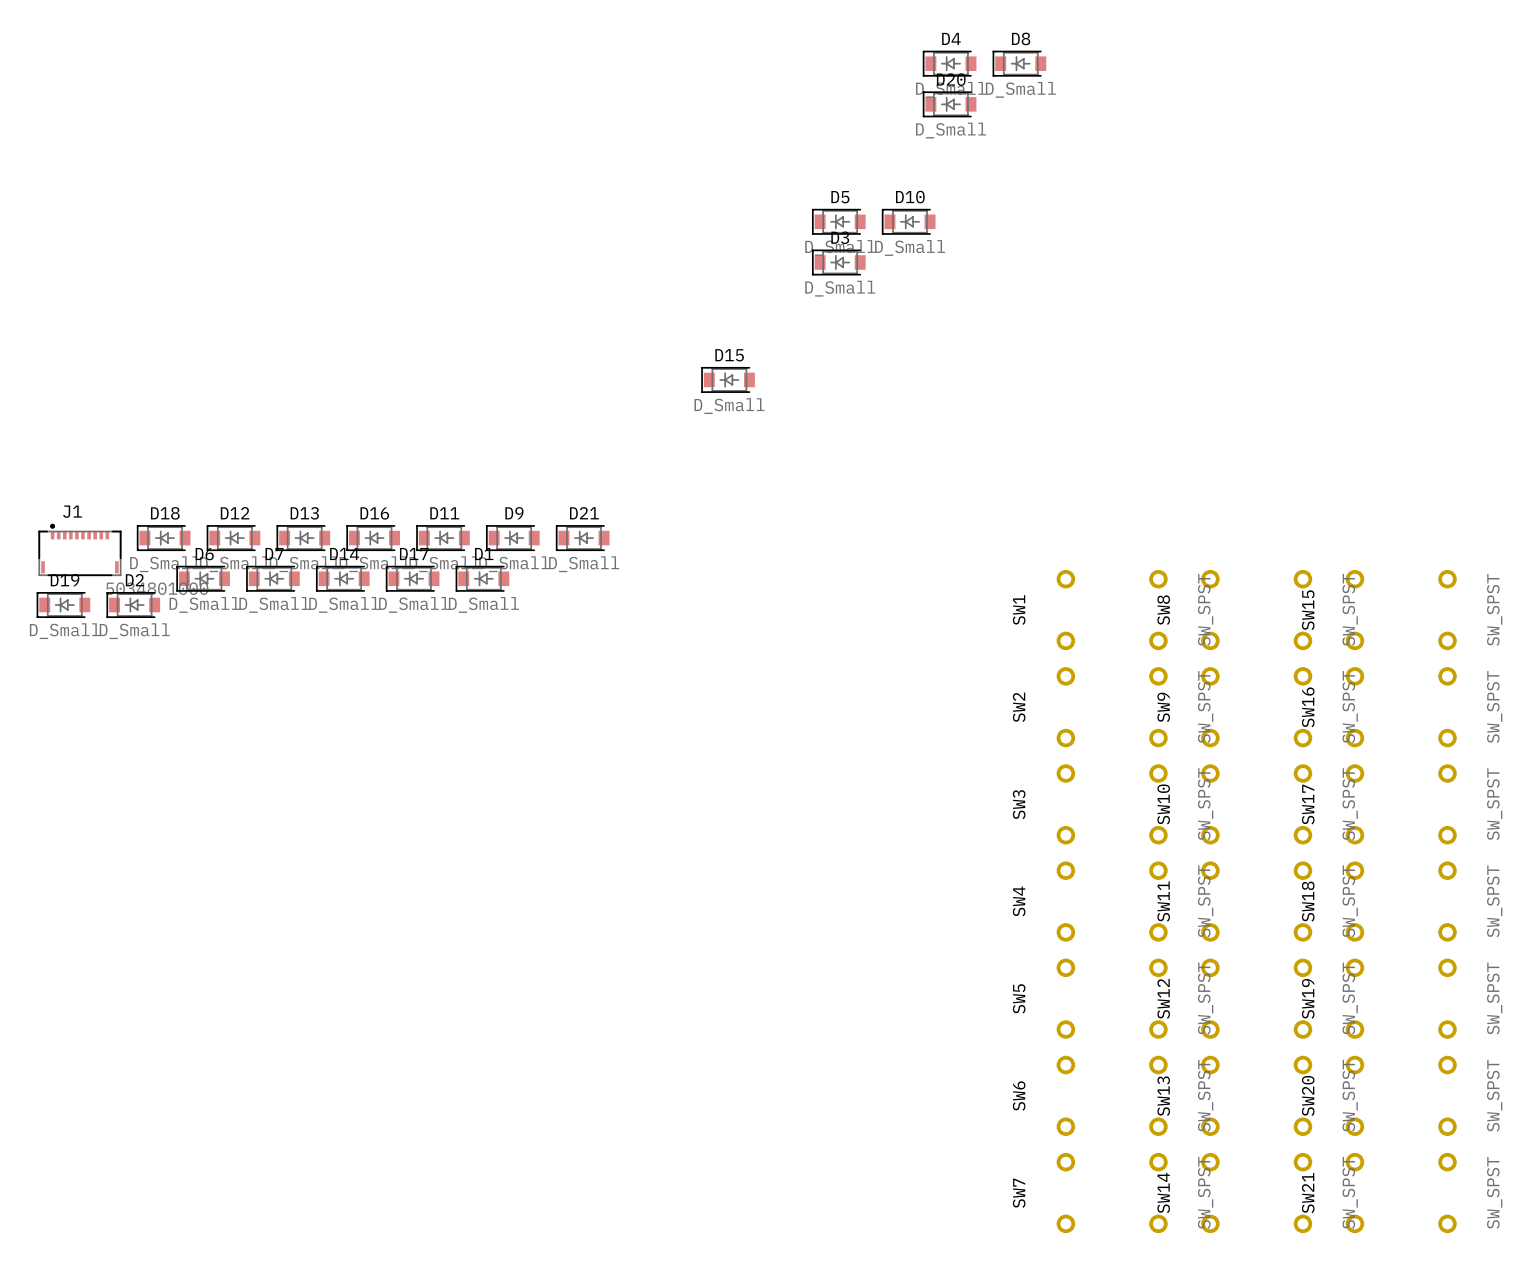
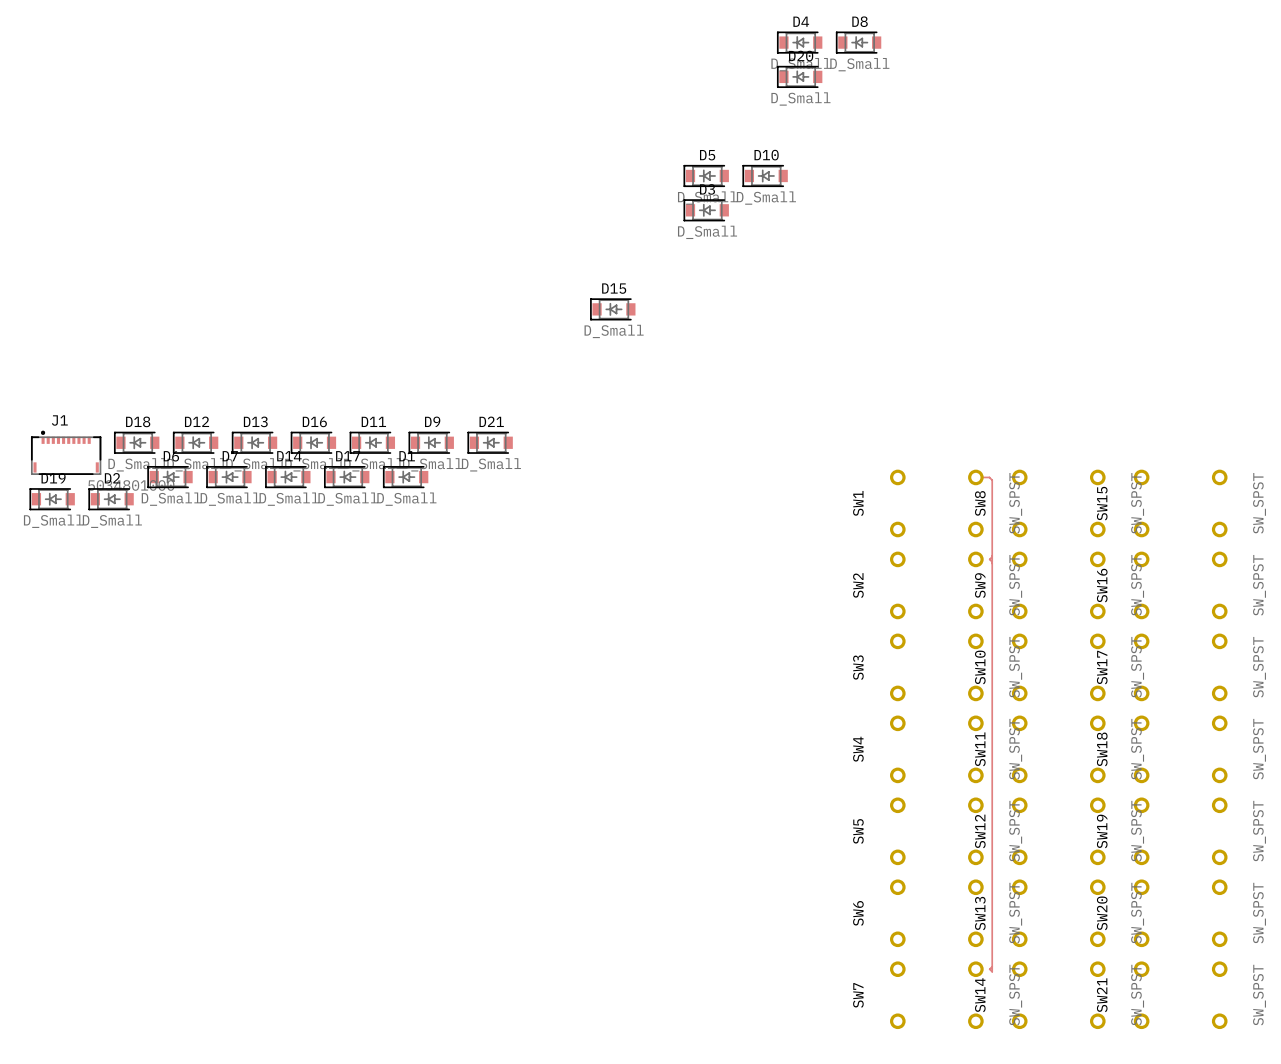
top track: none -> (975, 477) (989, 477) (992, 480) (992, 561) (989, 559) (992, 556)
top track: none -> (992, 562) (992, 971) (989, 969) (992, 966)

